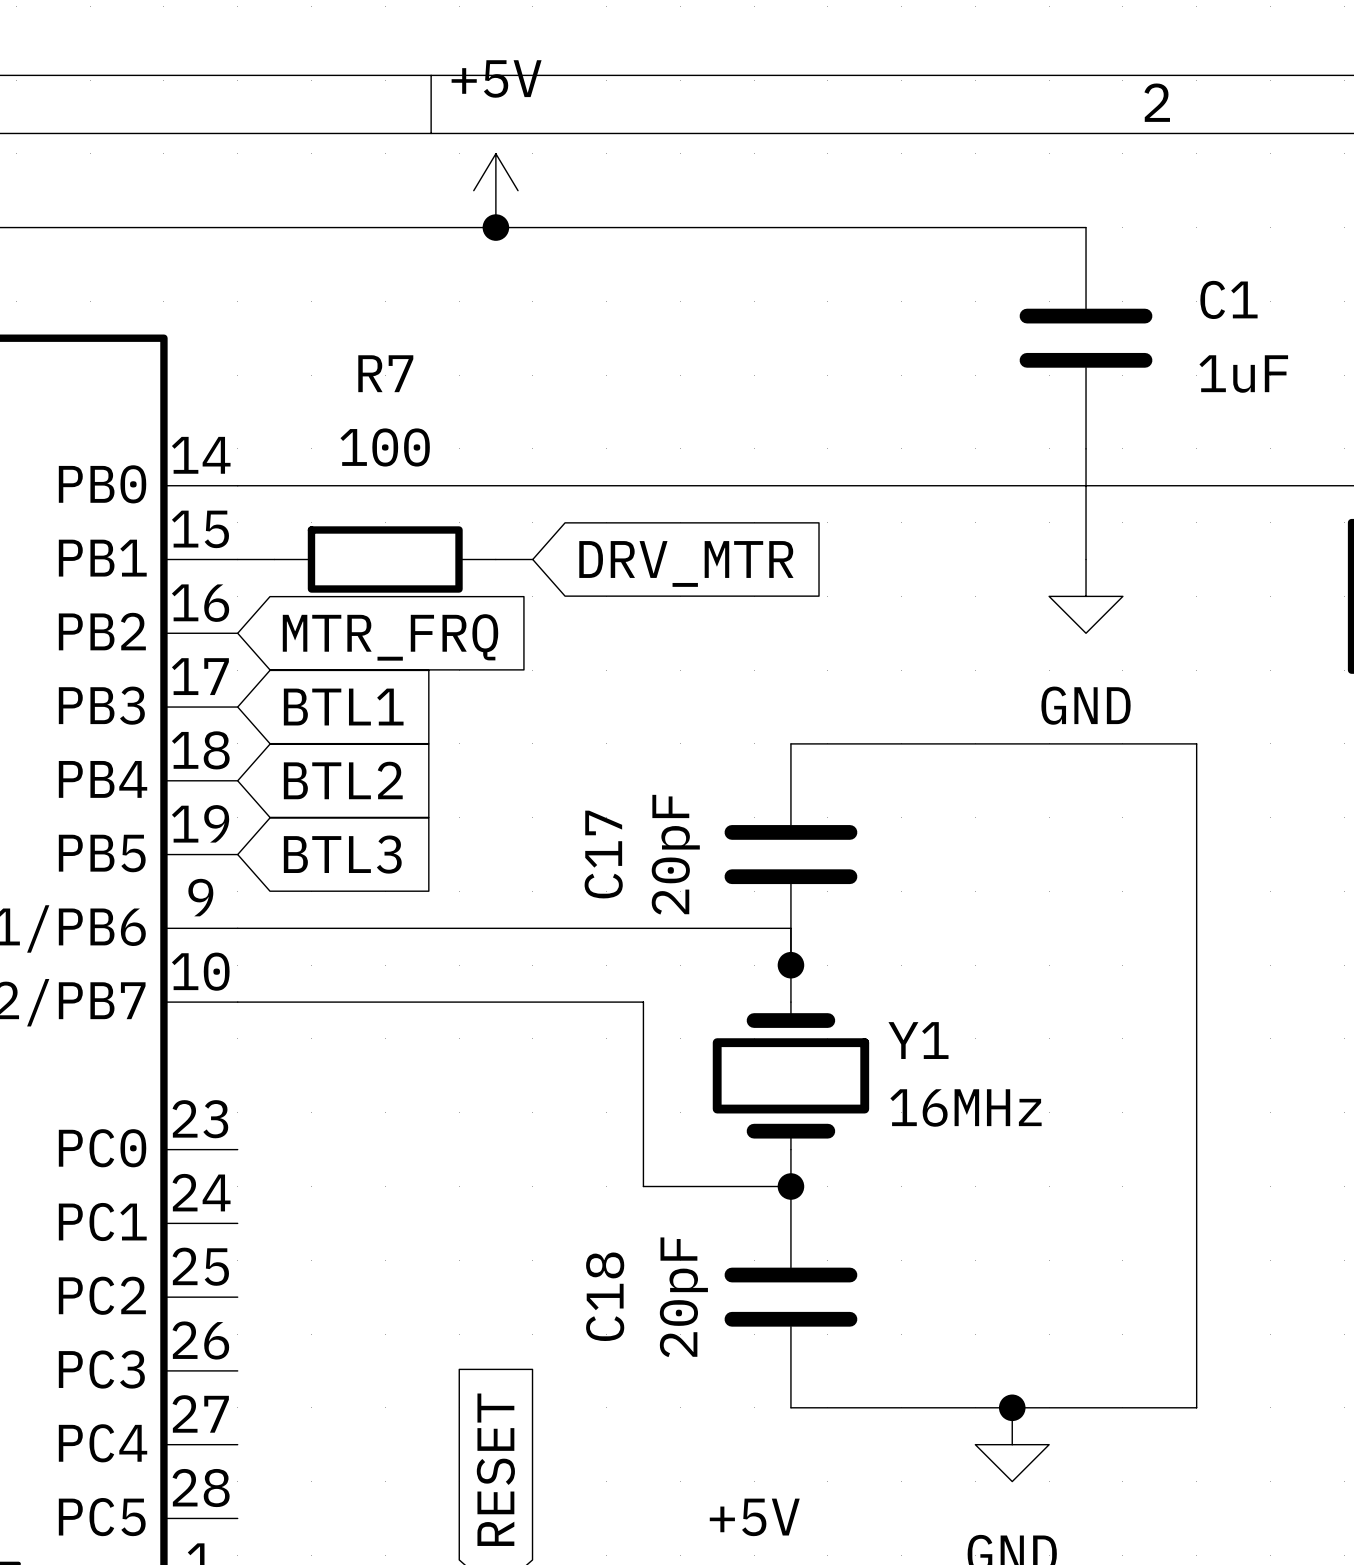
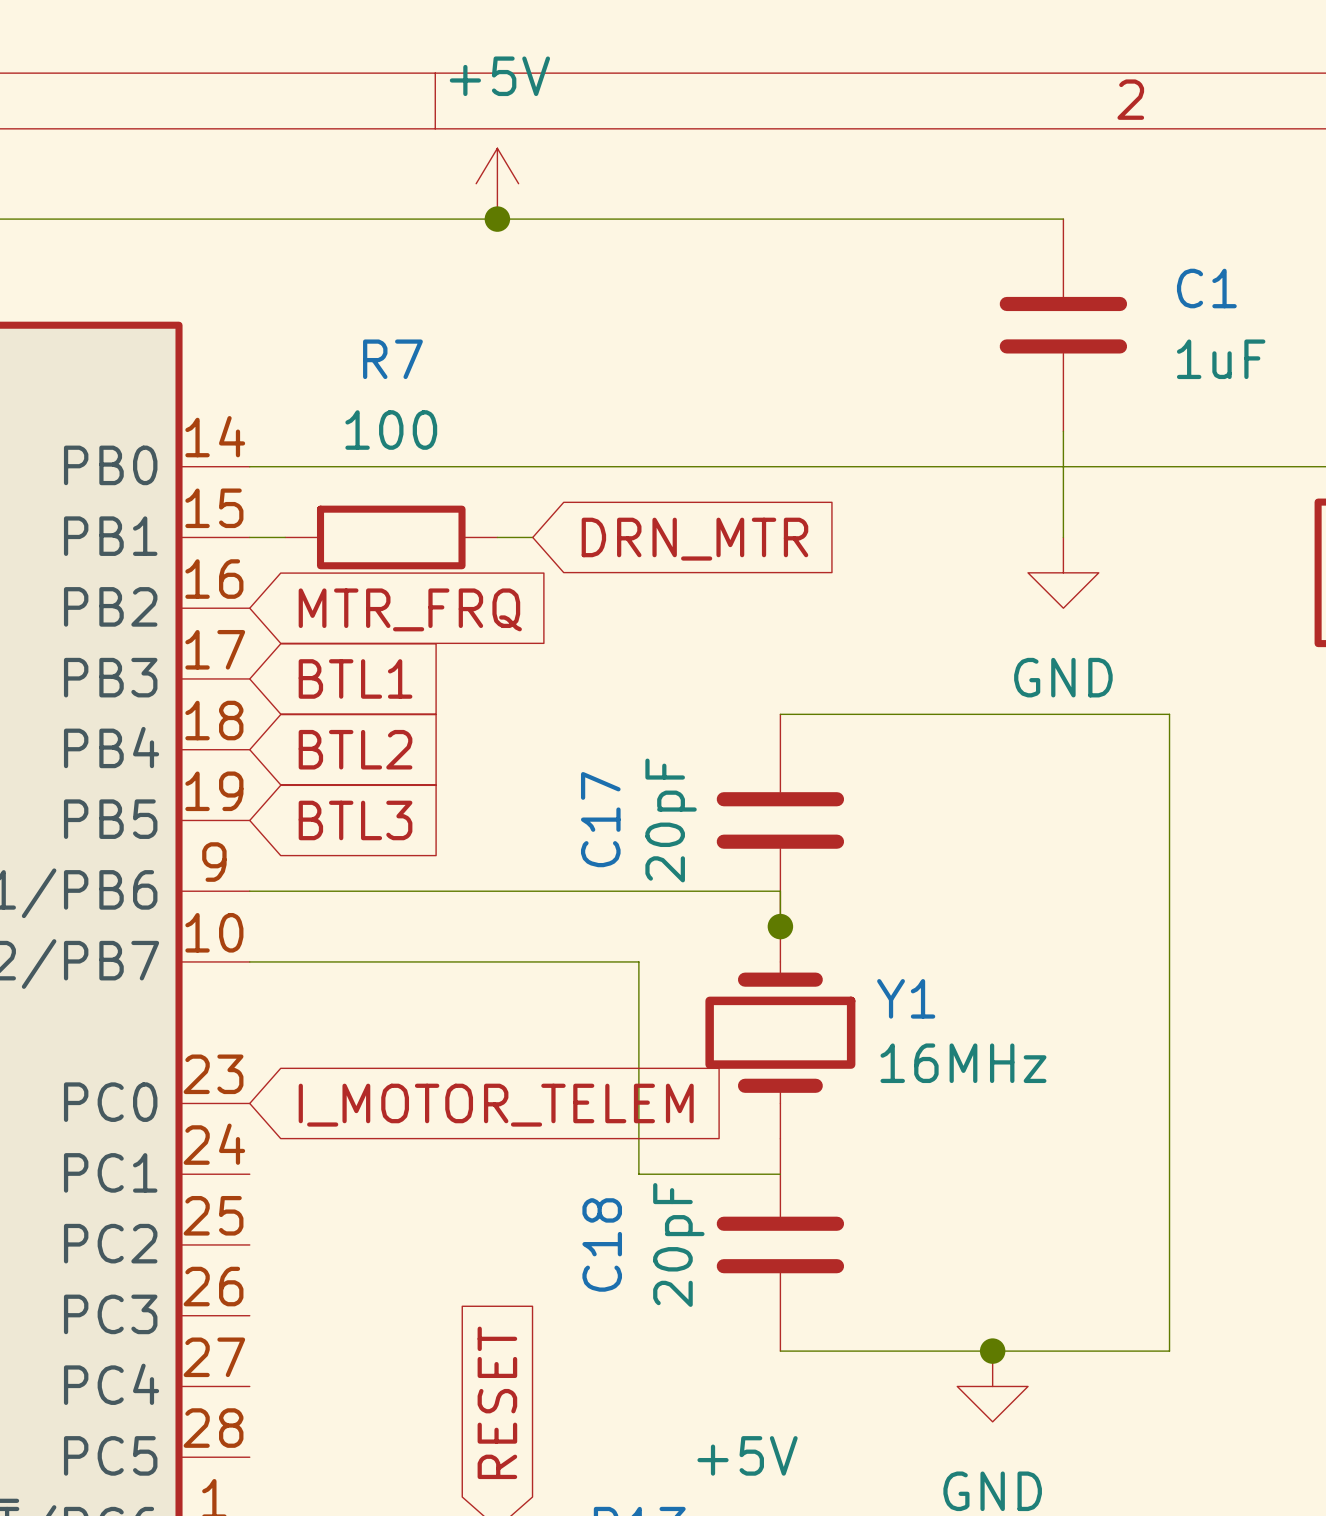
global label: DRV_MTR (686, 563) -> DRN_MTR (694, 539)
global label: none -> I_MOTOR_TELEM (496, 1105)
wire: (643, 1186) (790, 1186) -> (638, 1138) (638, 1174) (780, 1174)
junction: (790, 1186) -> none

